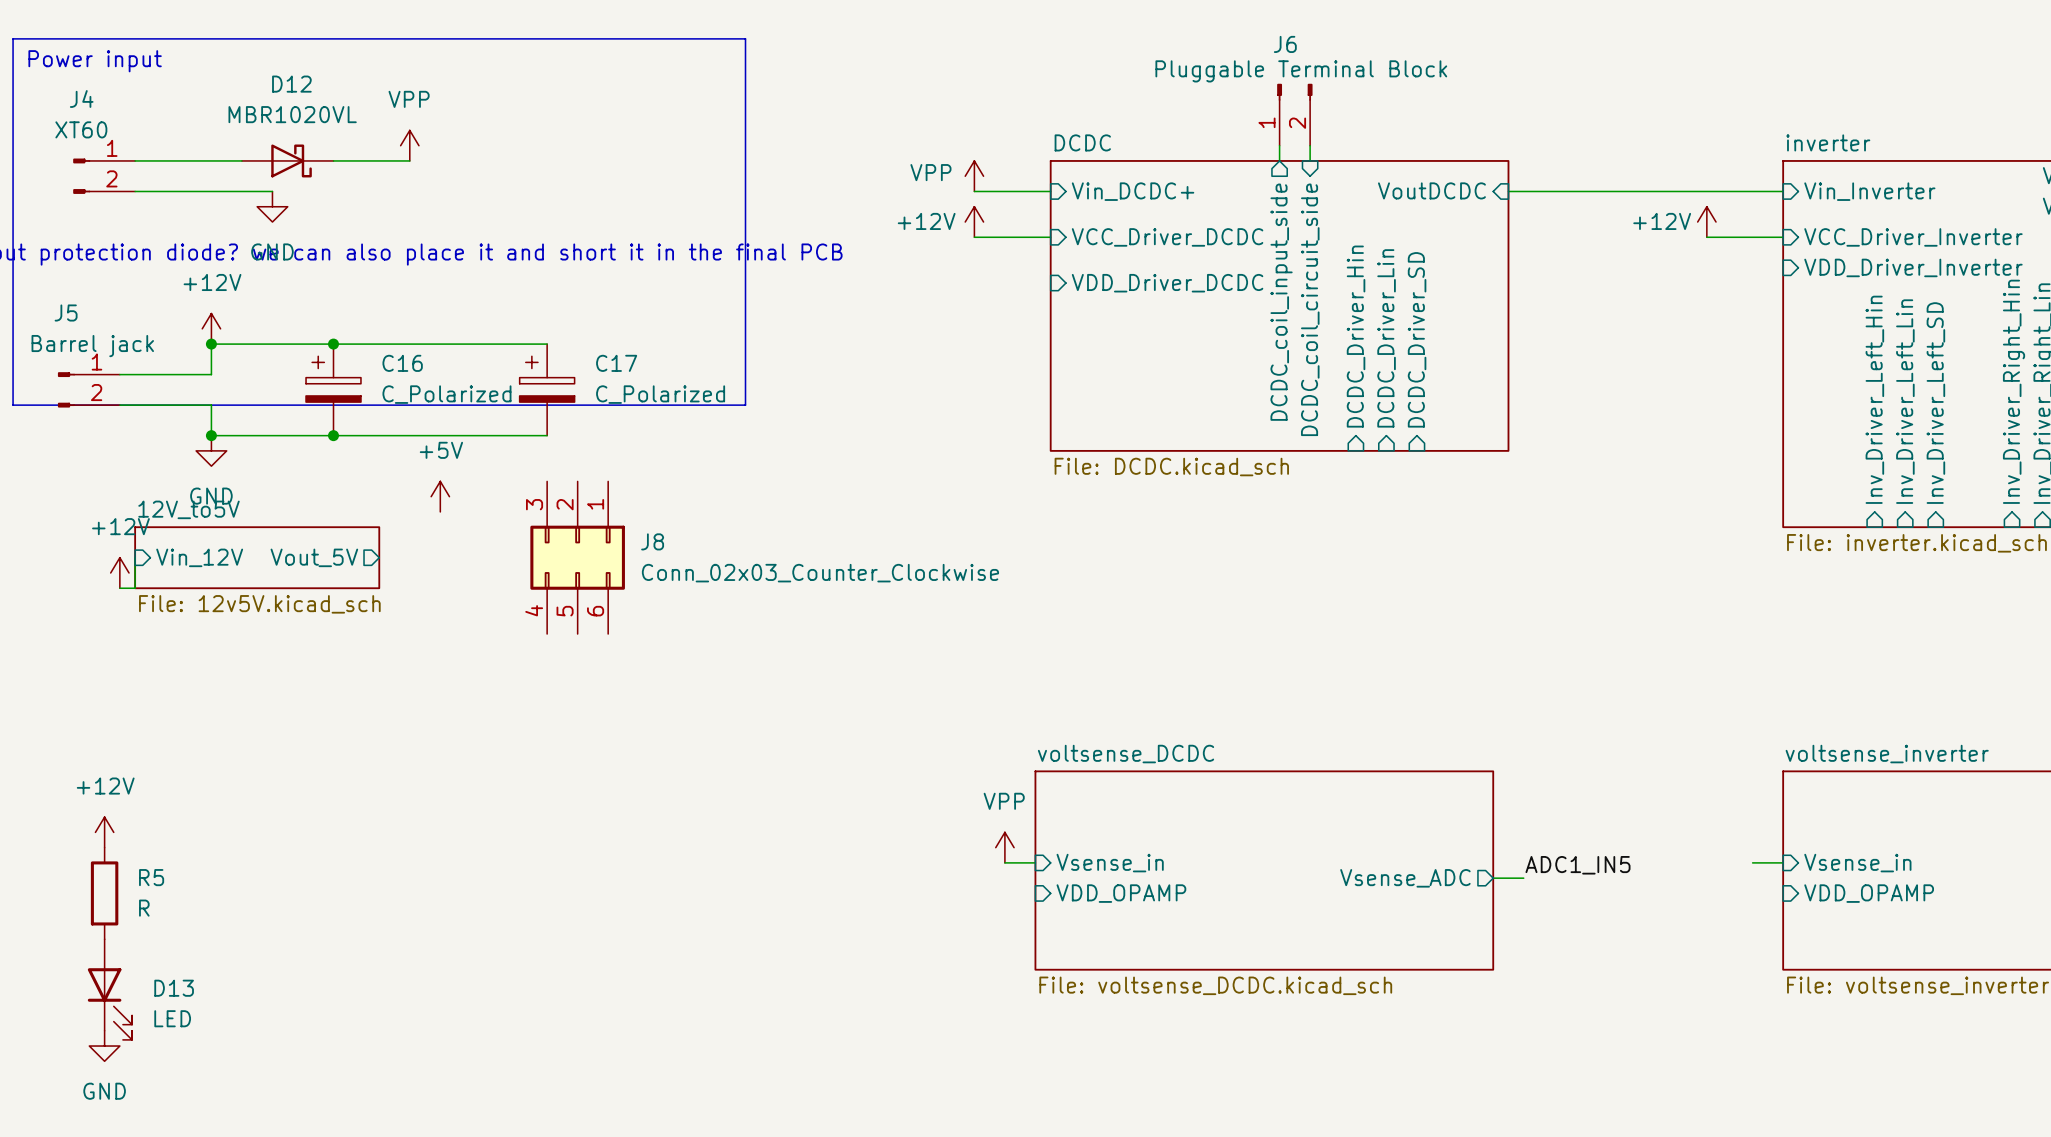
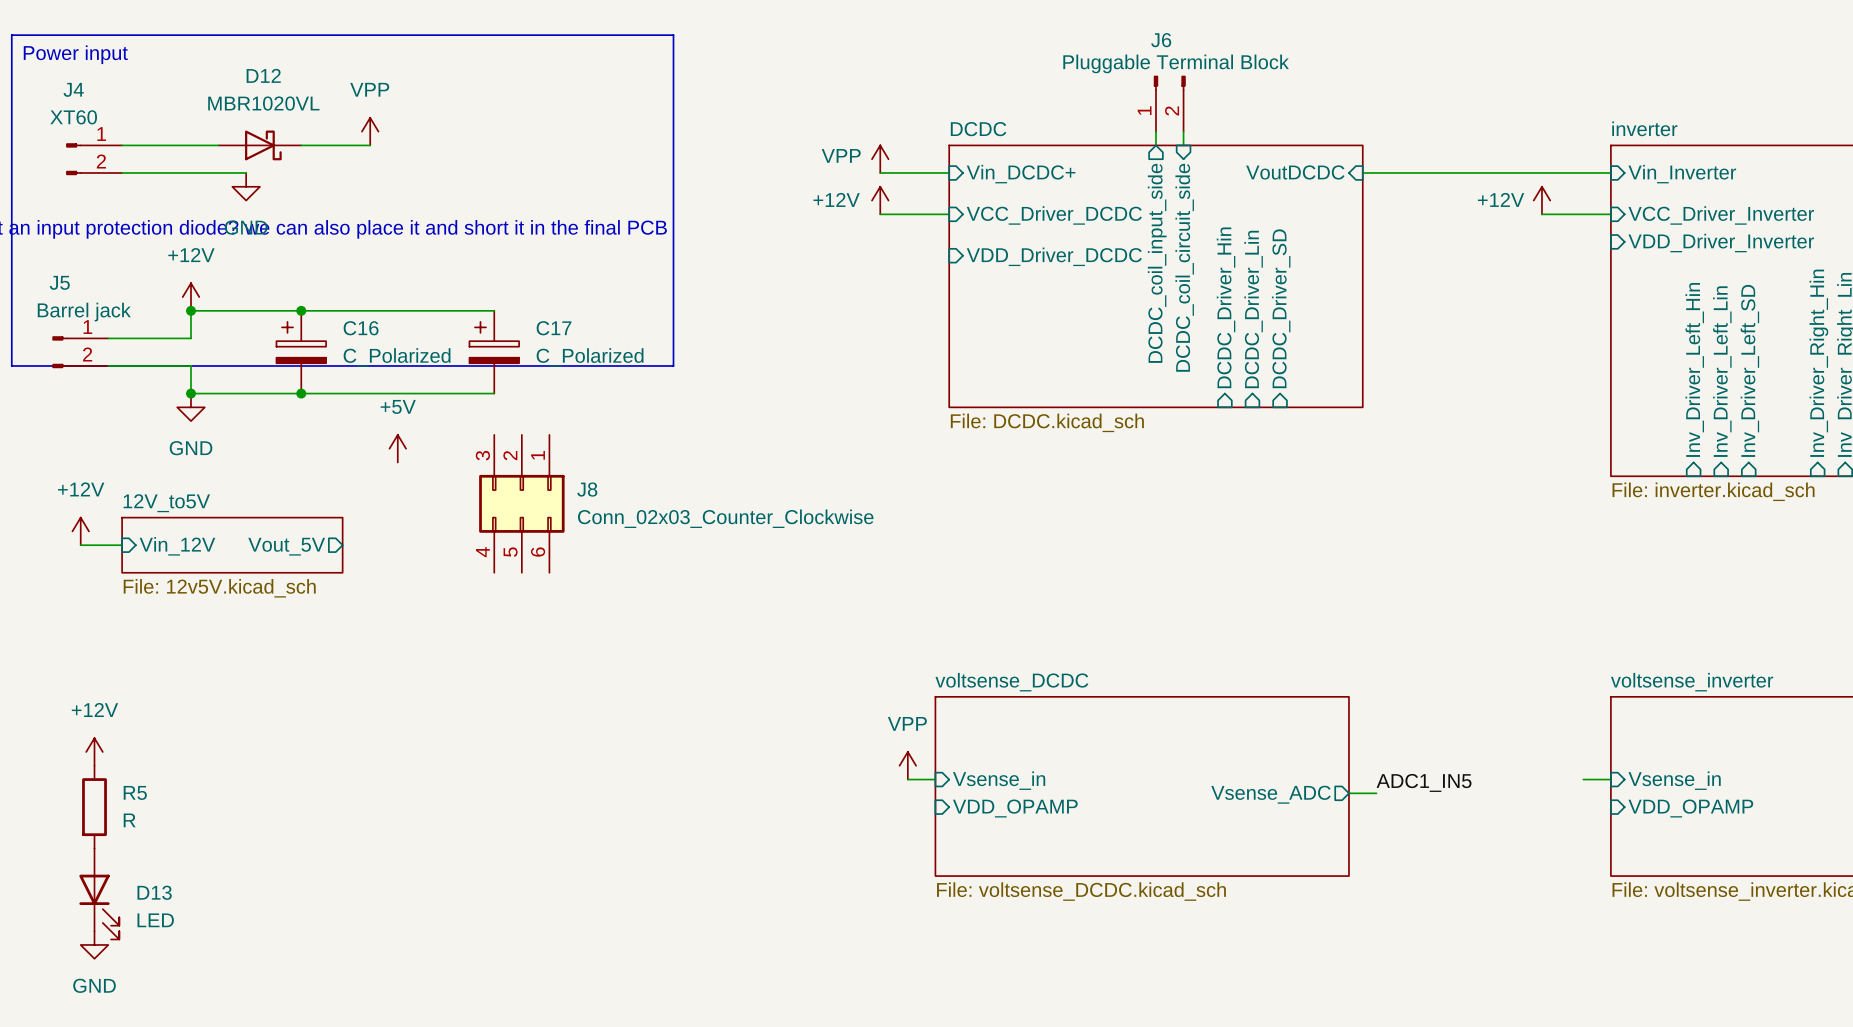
wire: (135, 557) (135, 588) (119, 588) -> none
sheet pin position: Vin_12V (199, 557) -> Vin_12V (177, 546)
sheet 12V_to5V position: (257, 557) -> (232, 545)
sheet pin position: Vout_5V (314, 557) -> Vout_5V (286, 546)
power symbol position: +12V (119, 572) -> +12V (80, 531)
wire: none -> (80, 545) (122, 545)

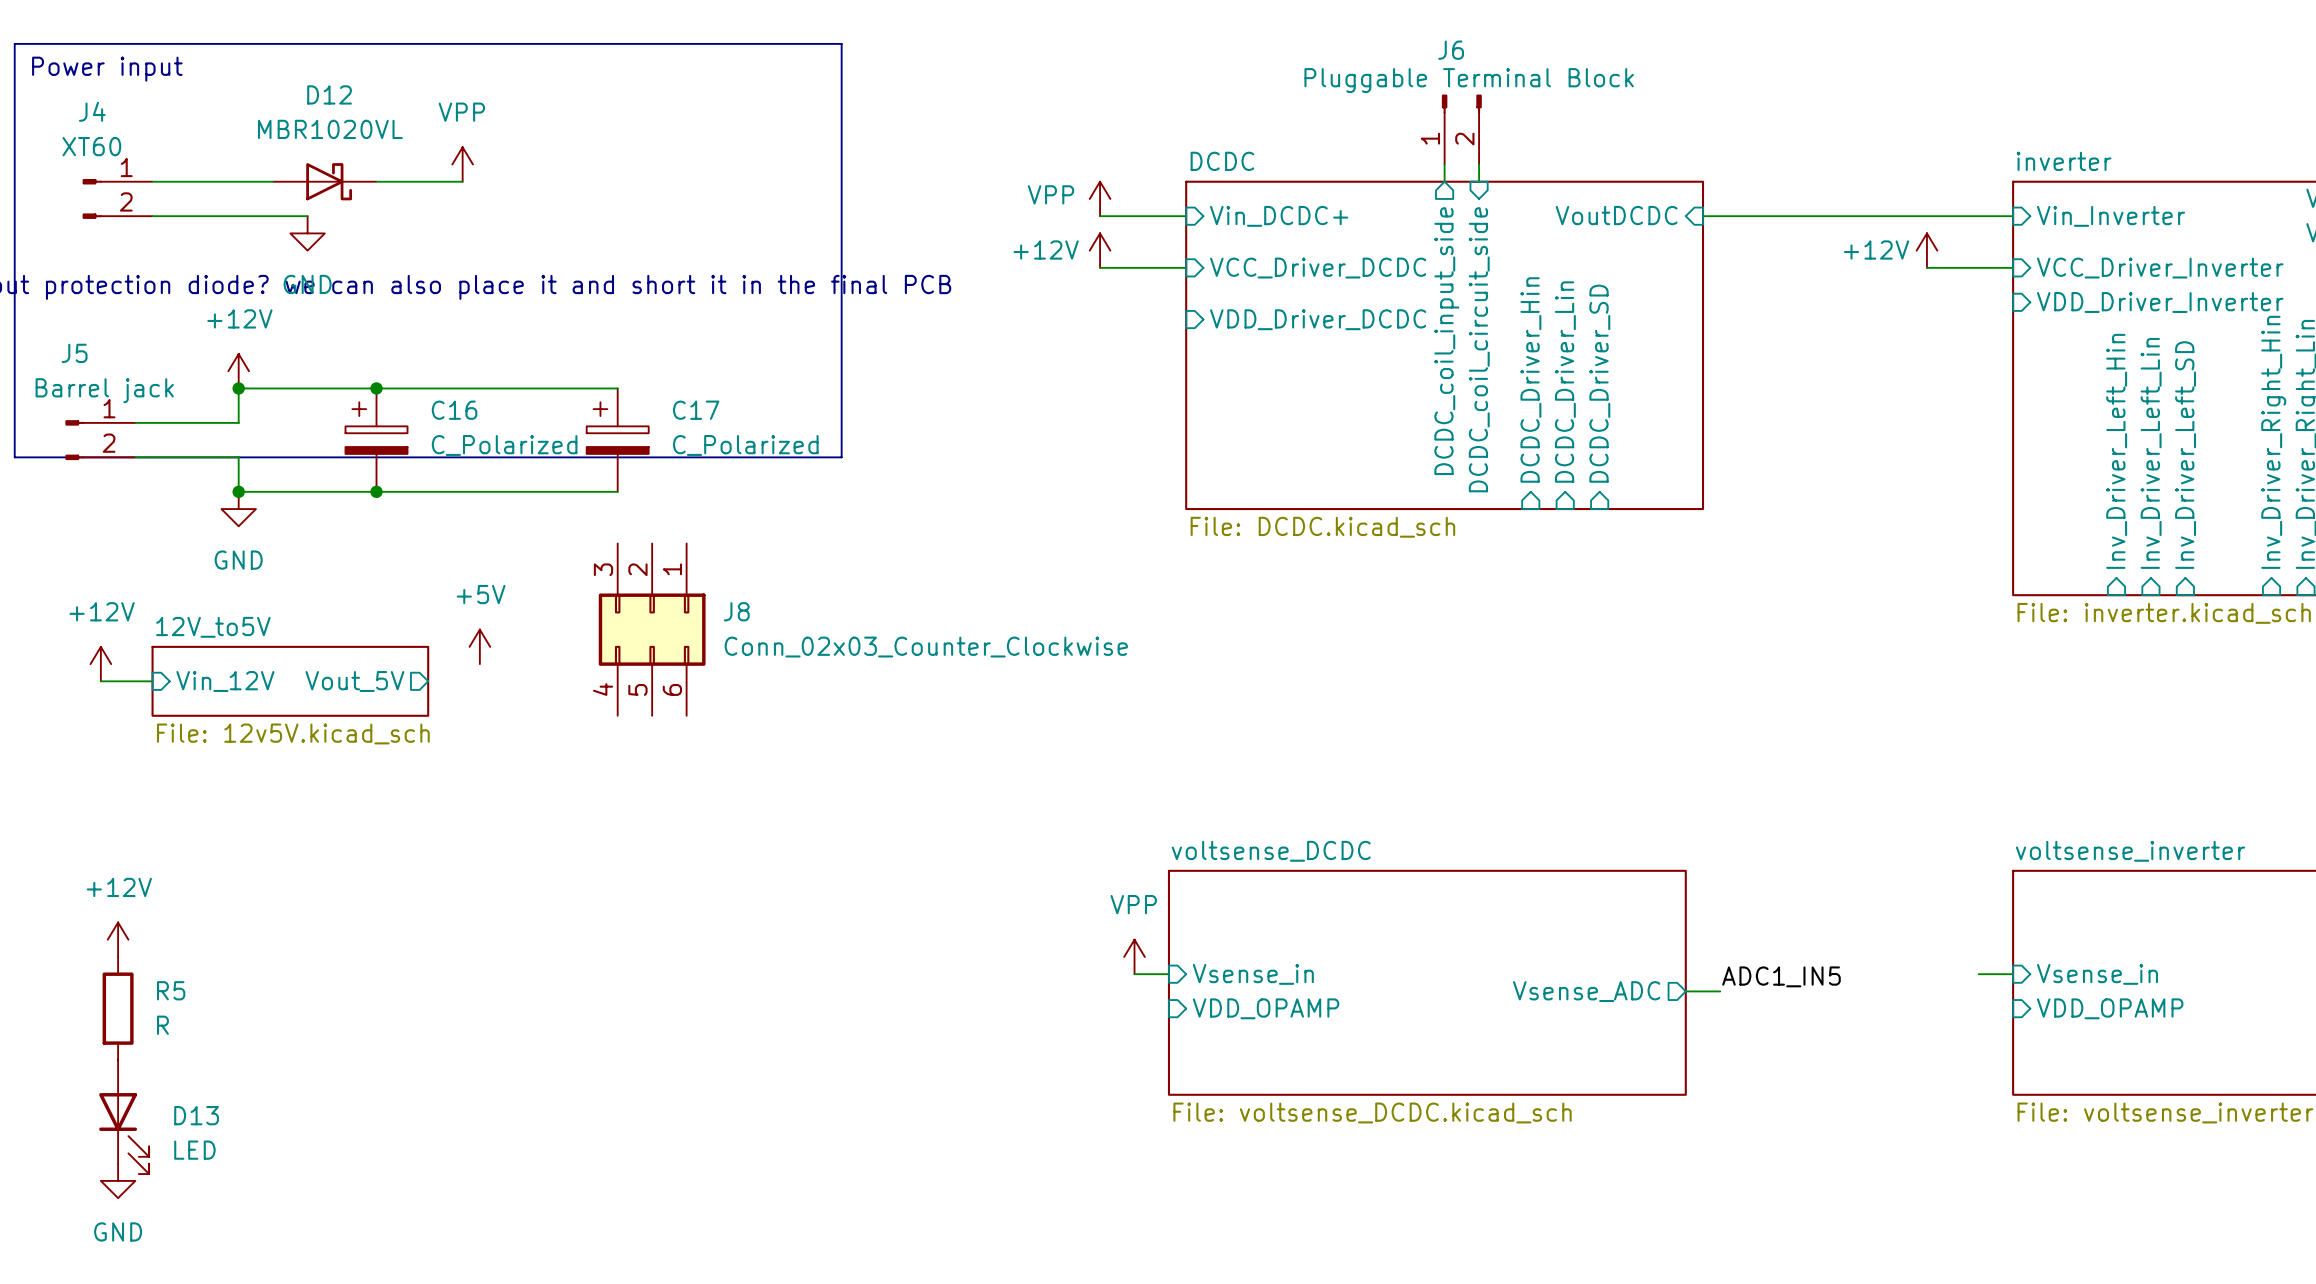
power symbol position: +5V (397, 448) -> +5V (479, 646)

